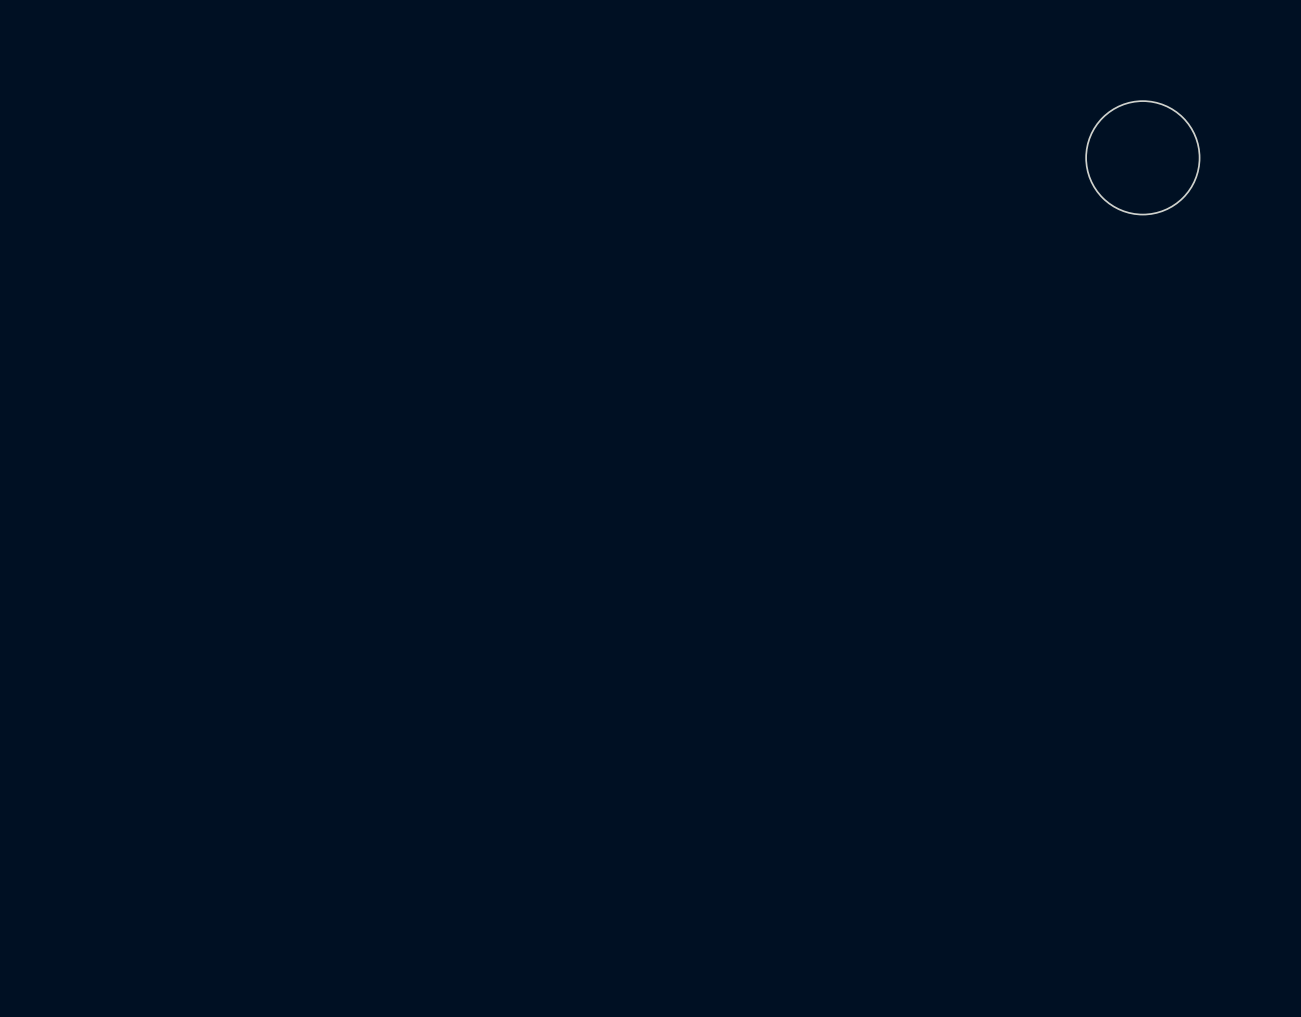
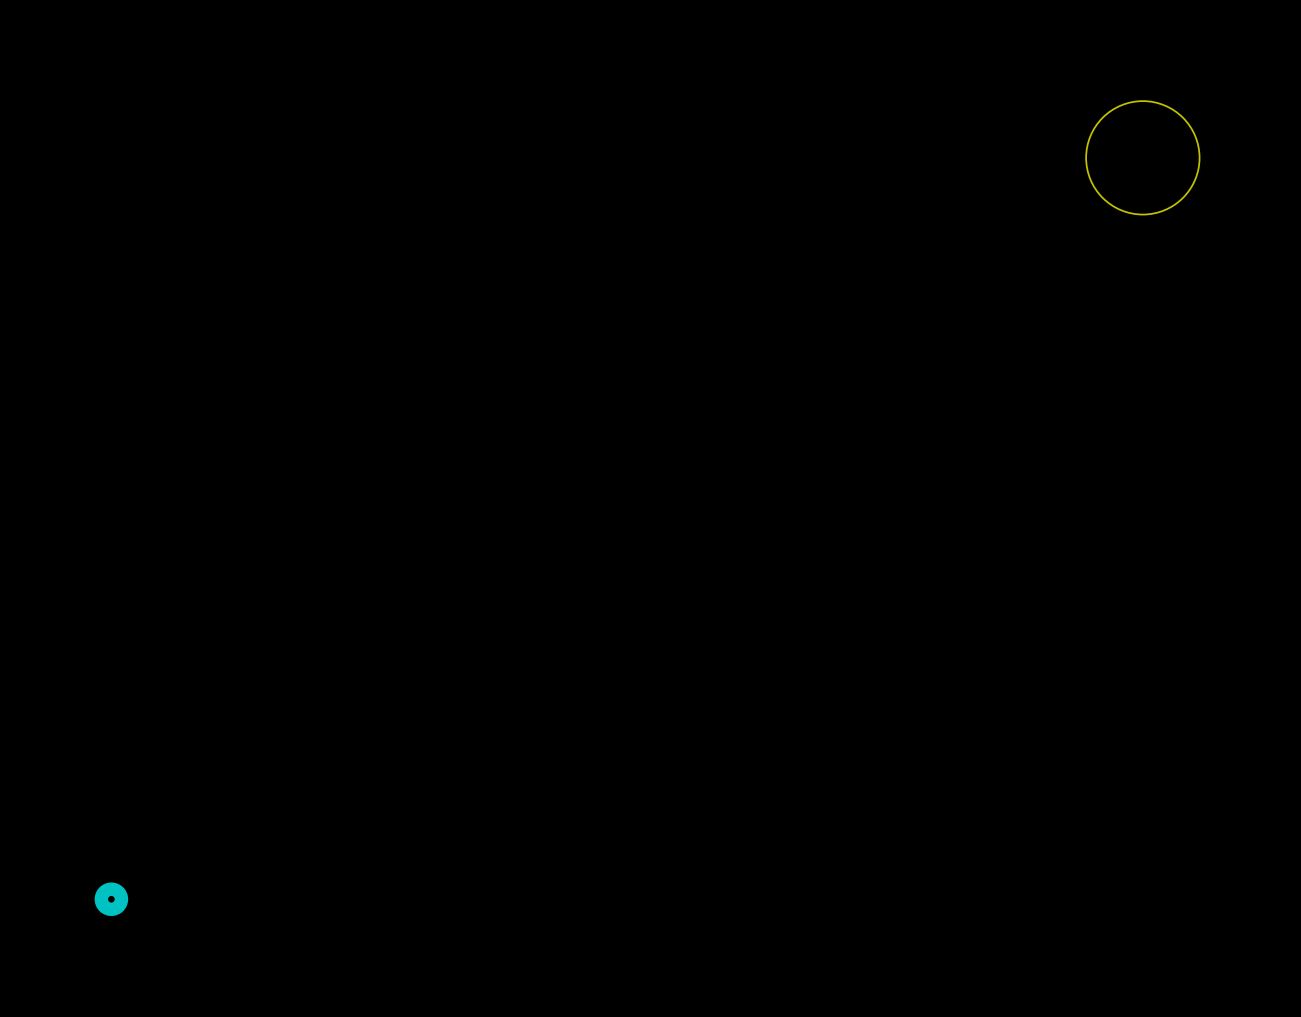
part: none -> (111, 899)

